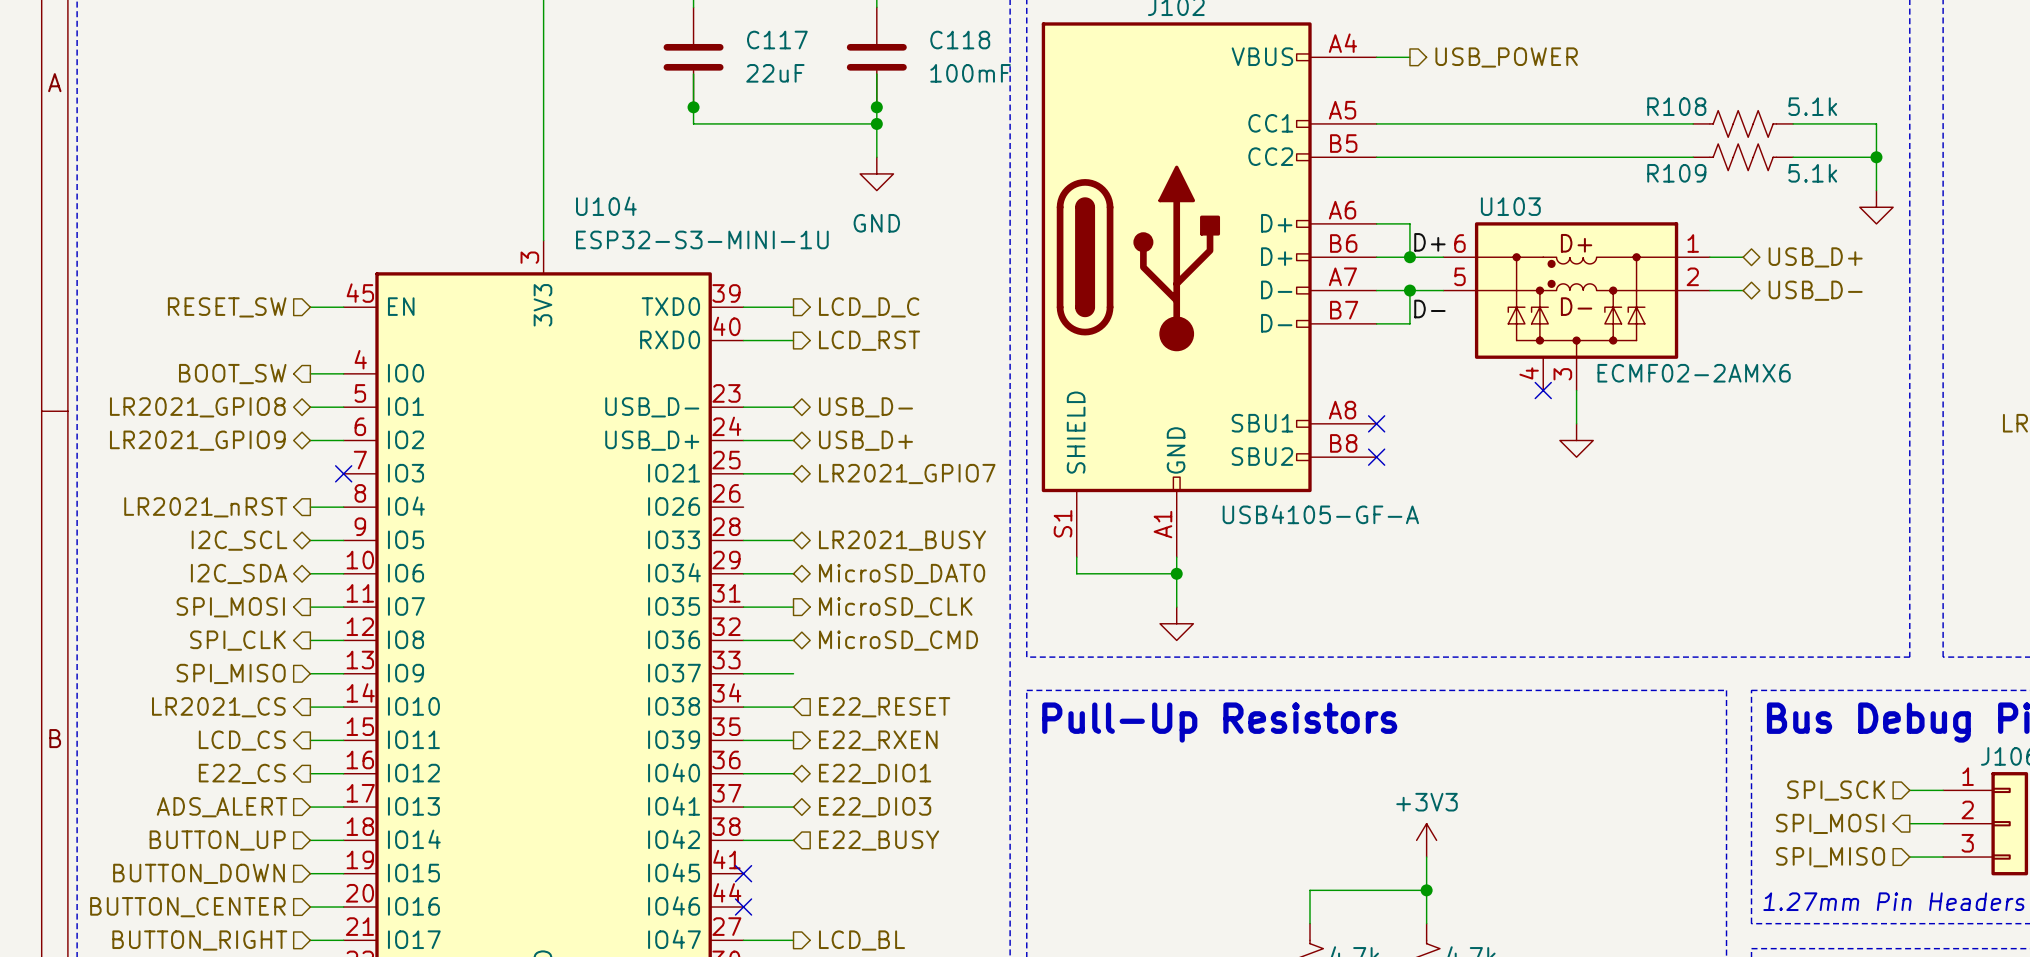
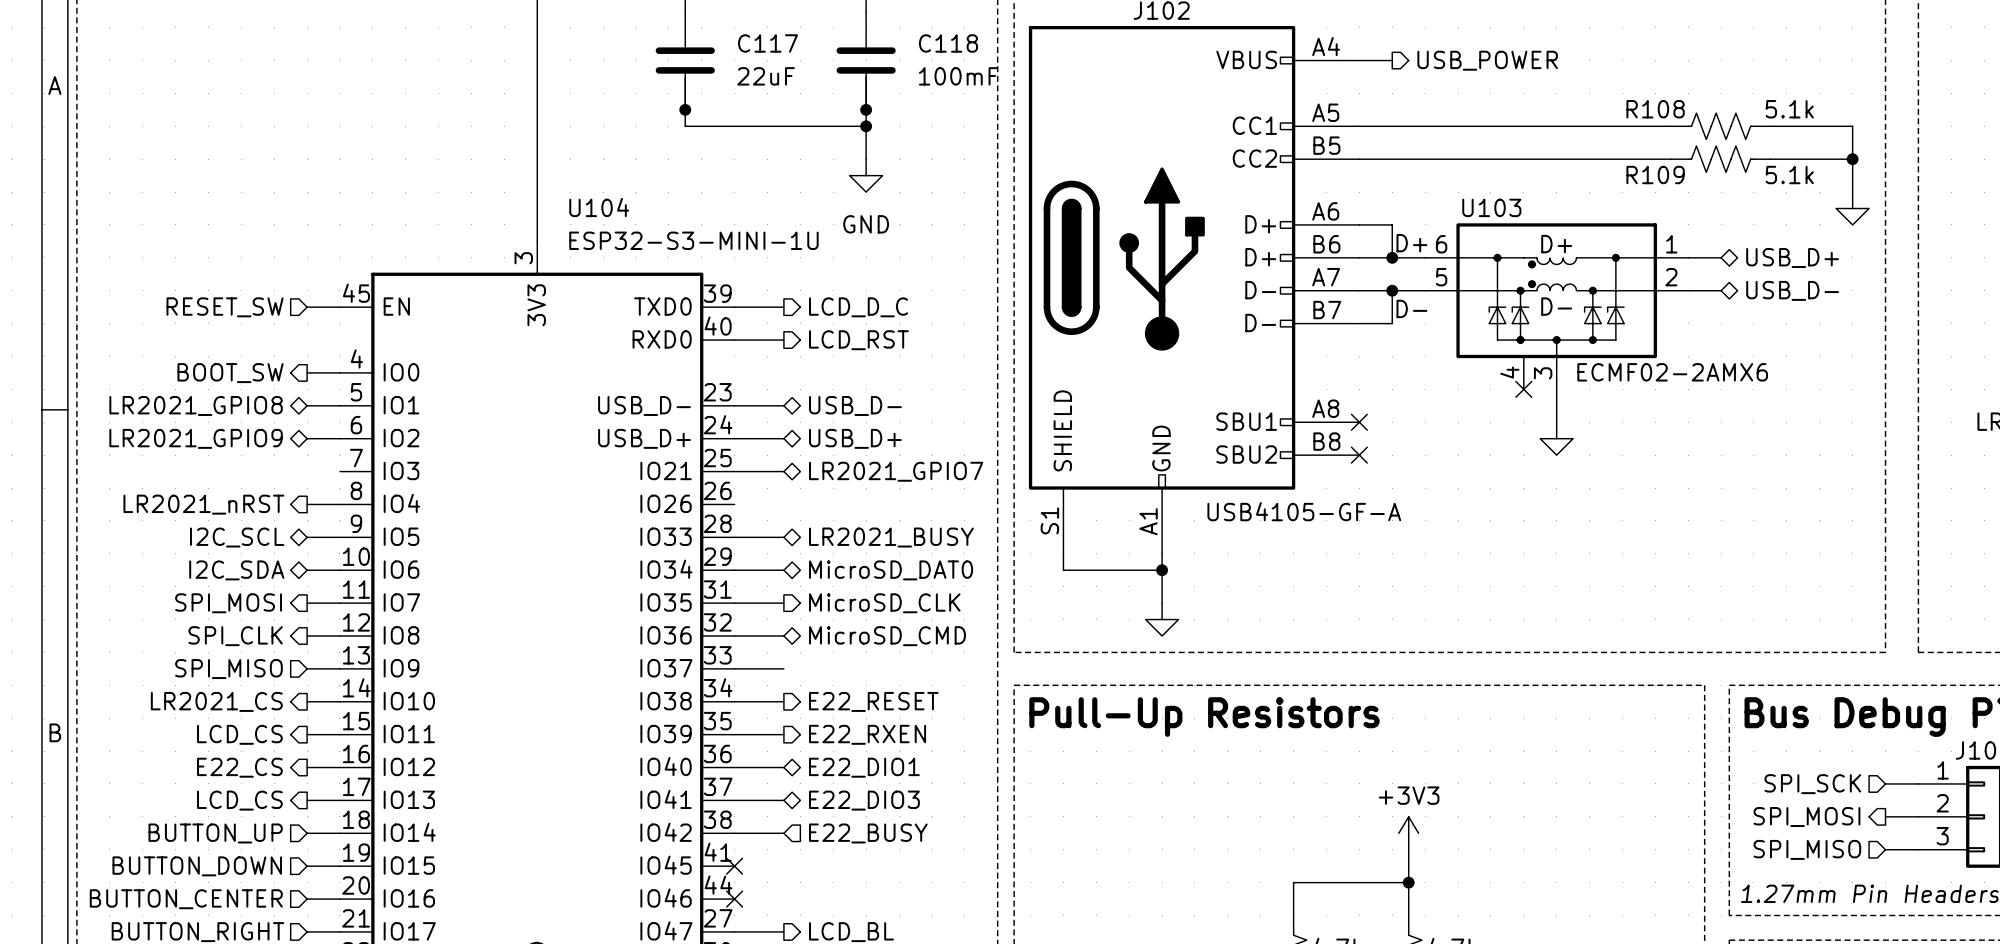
no-connect mark: (343, 473) -> none
hierarchical label shape: input (884, 707) -> output (873, 701)
hierarchical label shape: input (222, 807) -> output (239, 800)
hierarchical label: ADS_ALERT (222, 807) -> LCD_CS (239, 800)

